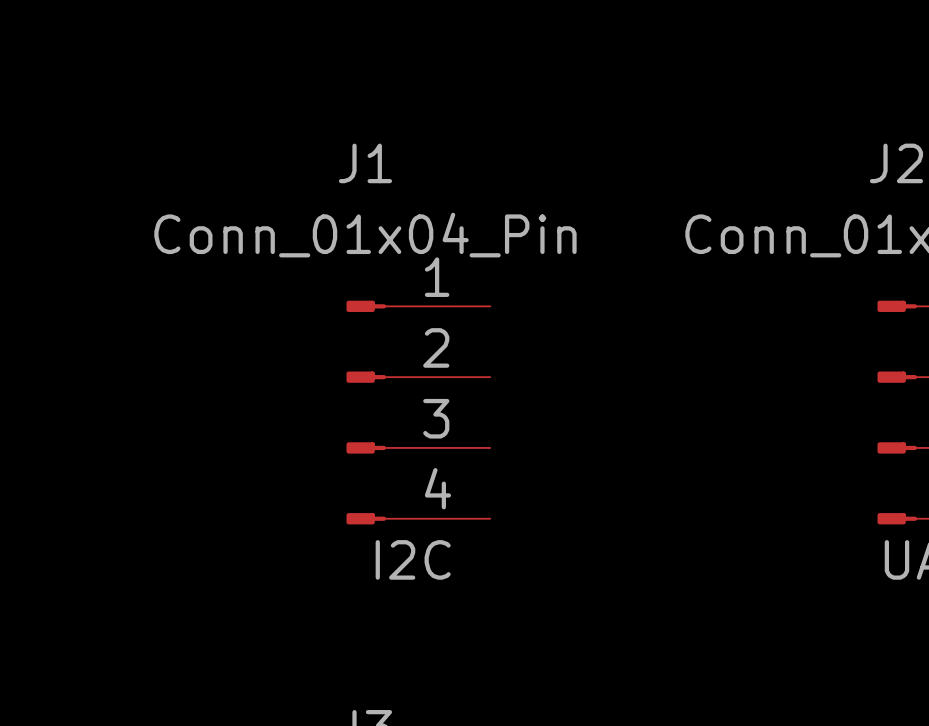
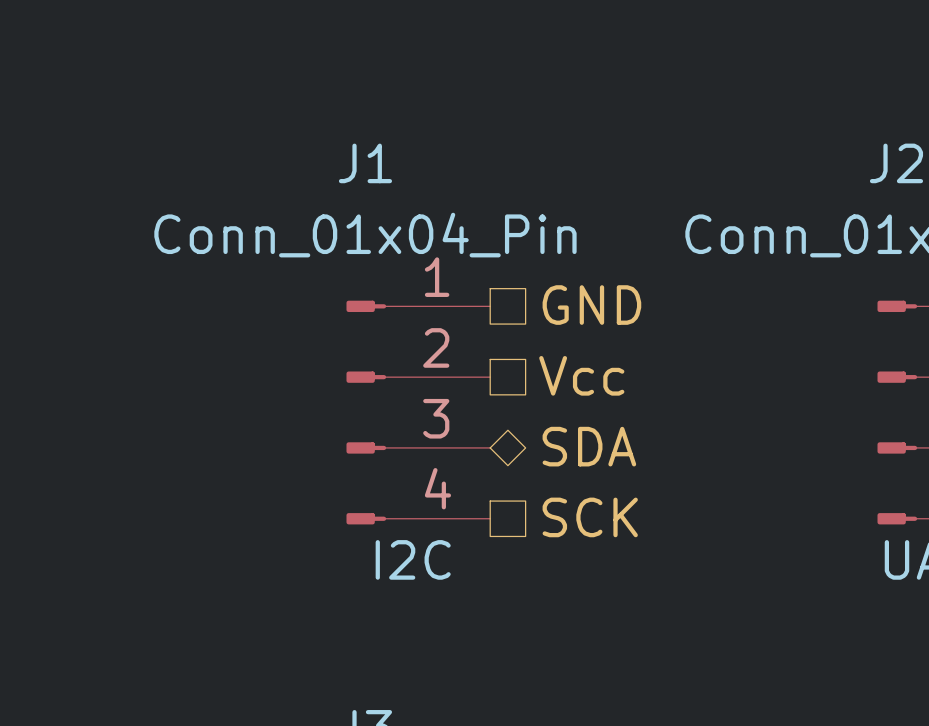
hierarchical label: none -> GND (591, 305)
hierarchical label: none -> Vcc (581, 375)
hierarchical label: none -> SDA (589, 446)
hierarchical label: none -> SCK (590, 517)

